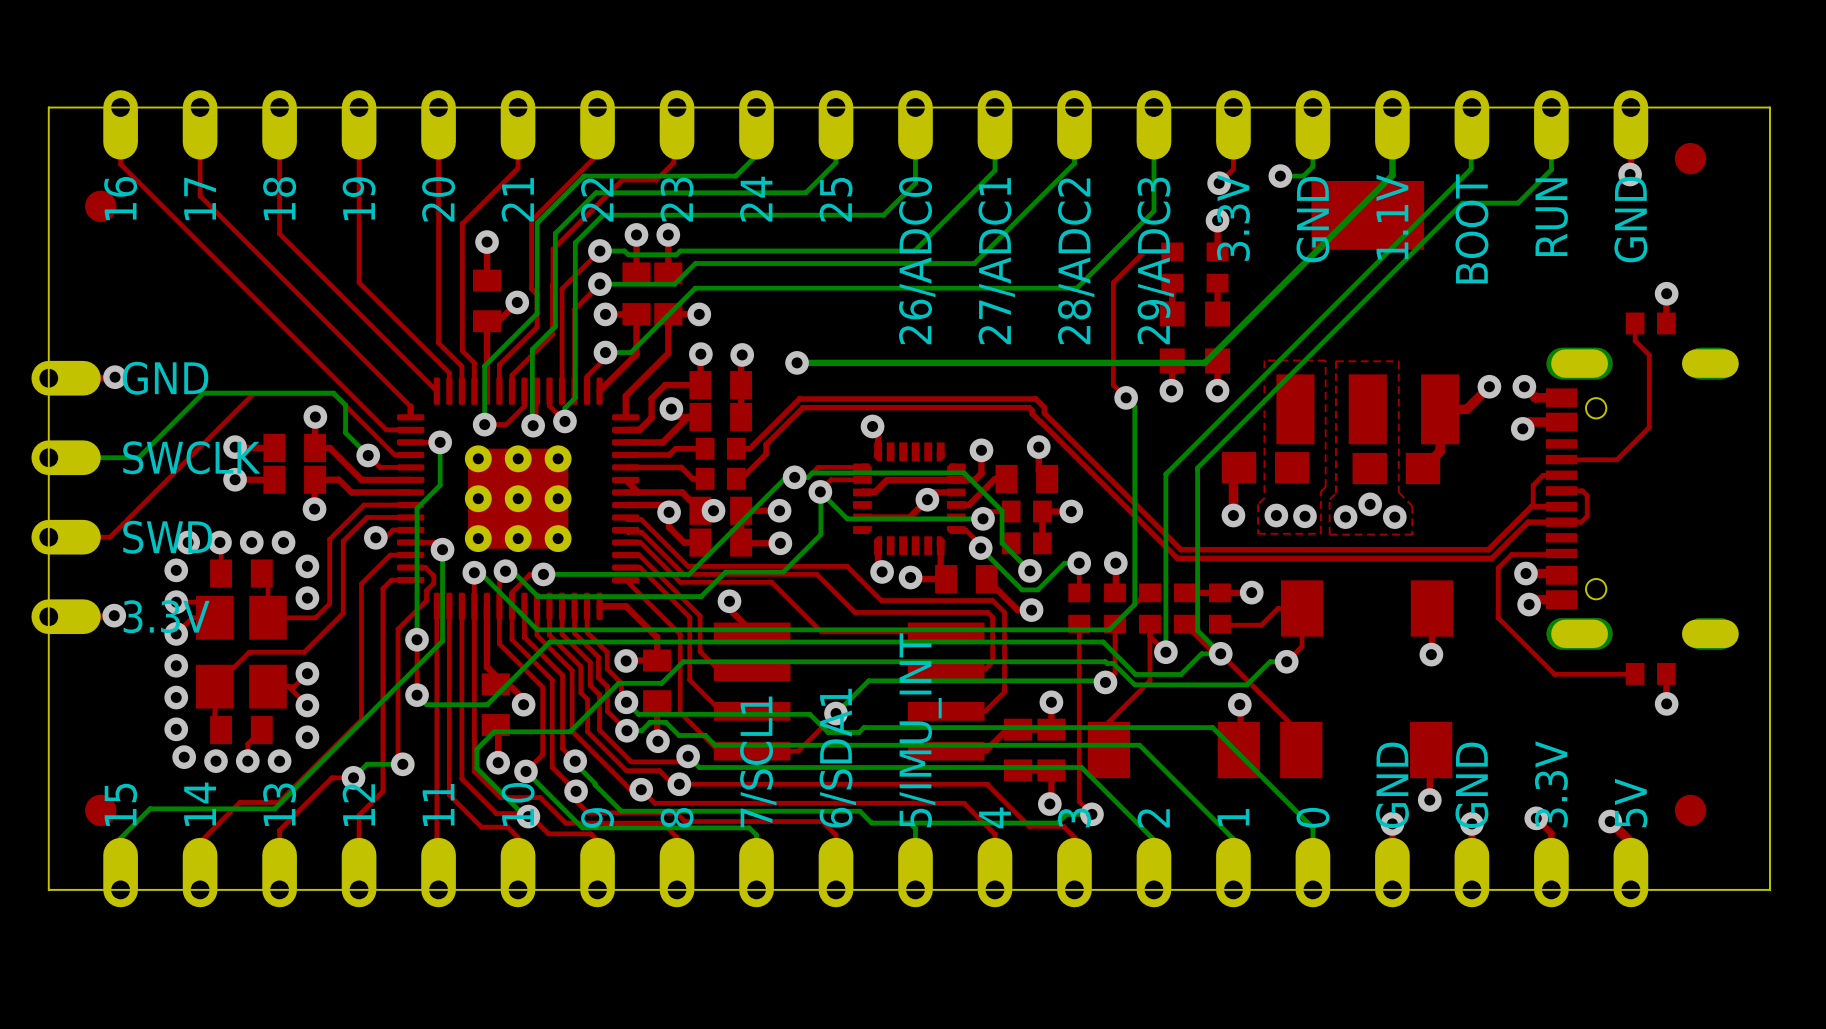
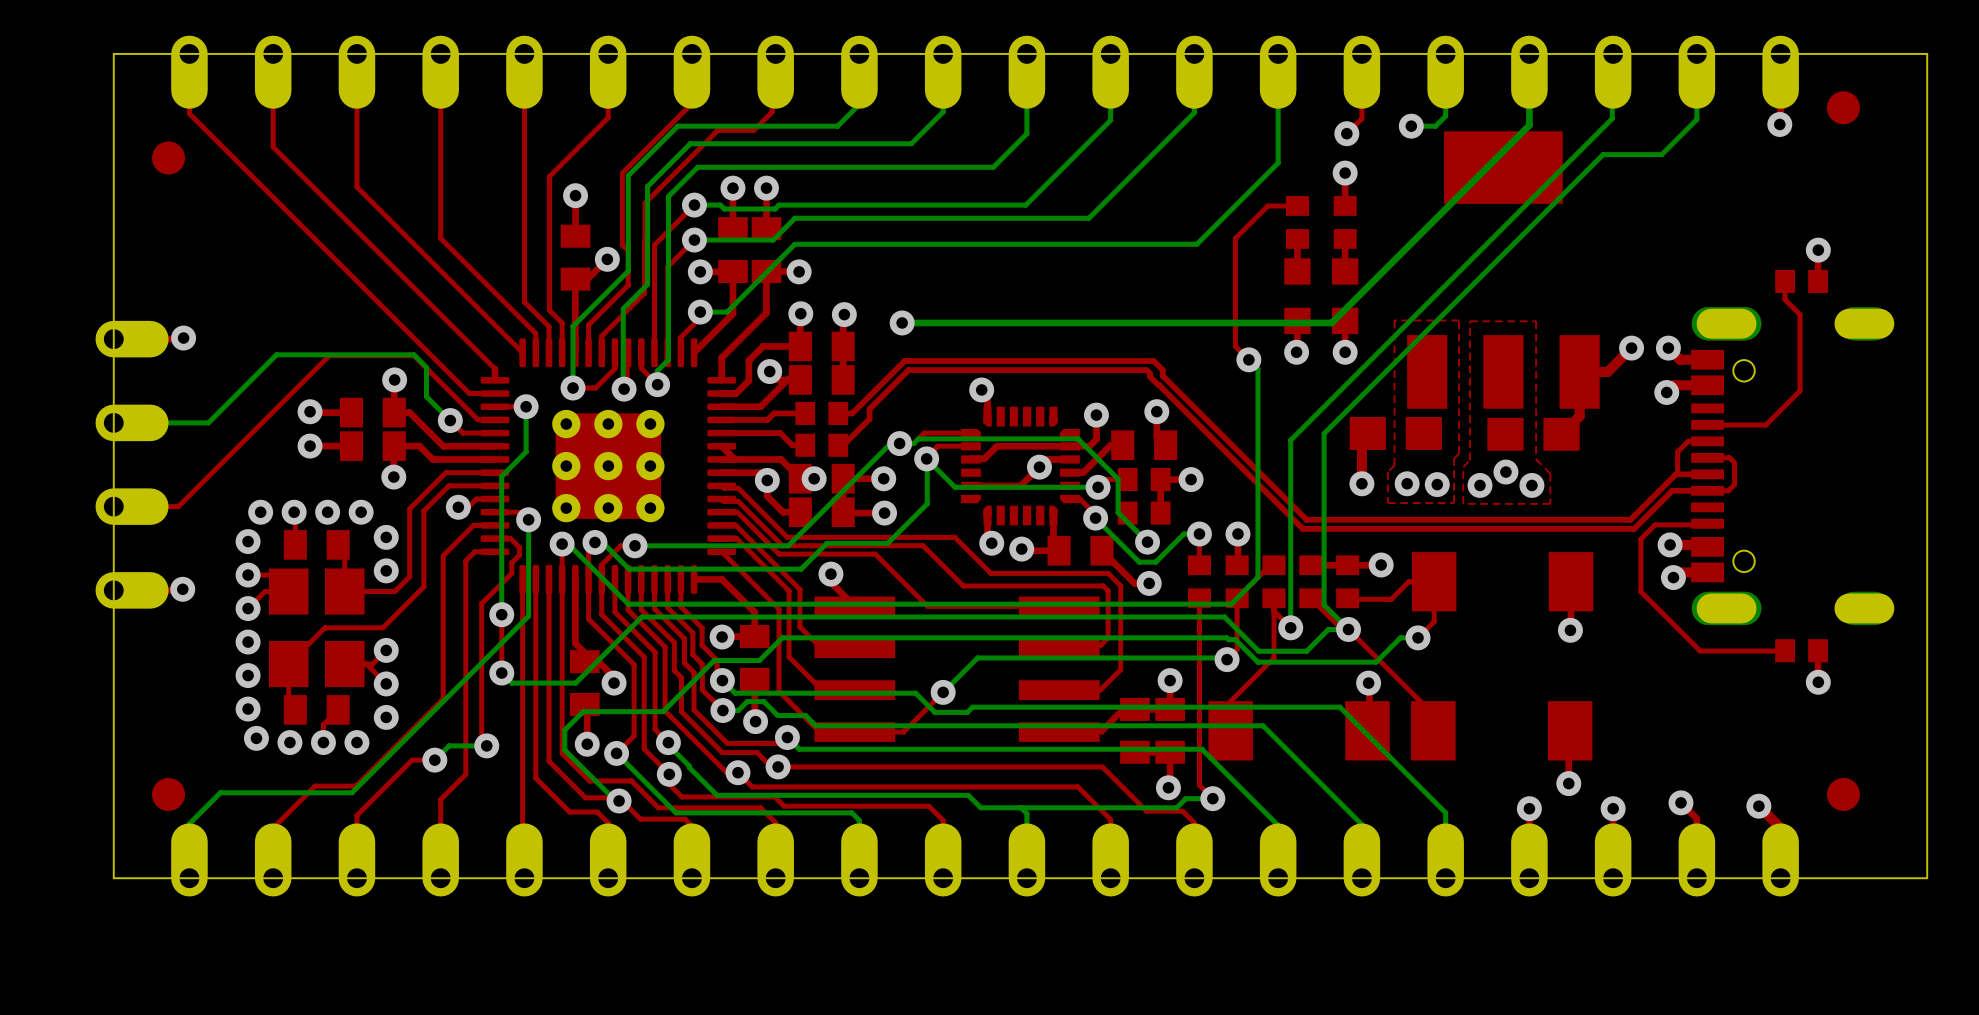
text: 16 (120, 198) -> none
text: 17 (200, 198) -> none
text: 18 (279, 198) -> none
text: 19 (359, 198) -> none
text: 20 (438, 199) -> none
text: 21 (517, 199) -> none
text: 22 (597, 199) -> none
text: 23 (677, 199) -> none
text: 24 (756, 199) -> none
text: 25 (836, 199) -> none
text: 3.3V (1233, 217) -> none
text: 1.1V (1392, 217) -> none
text: RUN (1551, 217) -> none
text: GND (1312, 219) -> none
text: GND (1630, 219) -> none
text: BOOT (1471, 228) -> none
text: 26/ADC0 (917, 260) -> none
text: 29/ADC3 (1155, 260) -> none
text: 27/ADC1 (996, 261) -> none
text: 28/ADC2 (1076, 261) -> none
text: GND (165, 378) -> none
text: SWCLK (191, 457) -> none
text: SWD (167, 537) -> none
text: 3.3V (166, 616) -> none
text: 5/IMU_INT (920, 730) -> none
text: 6/SDA1 (837, 758) -> none
text: 7/SCL1 (758, 761) -> none
text: 3.3V (1551, 784) -> none
text: GND (1392, 785) -> none
text: GND (1471, 785) -> none
text: 5V (1631, 803) -> none
text: 15 (120, 804) -> none
text: 14 (200, 804) -> none
text: 13 (279, 804) -> none
text: 11 (438, 804) -> none
text: 10 (518, 804) -> none
text: 12 (358, 805) -> none
text: 9 (597, 817) -> none
text: 8 (677, 817) -> none
text: 4 (994, 817) -> none
text: 3 (1074, 817) -> none
text: 1 (1233, 817) -> none
text: 0 (1312, 817) -> none
text: 2 (1153, 818) -> none

